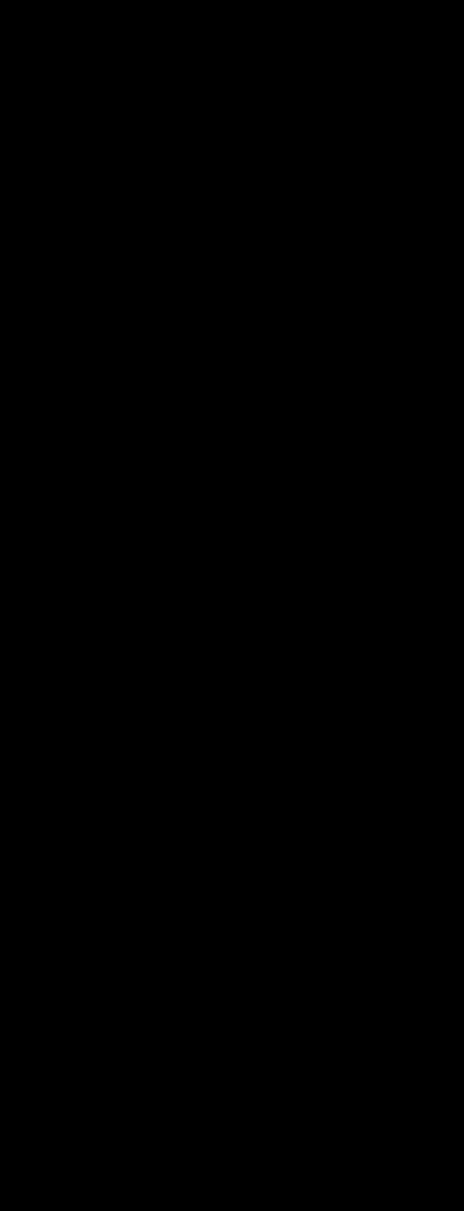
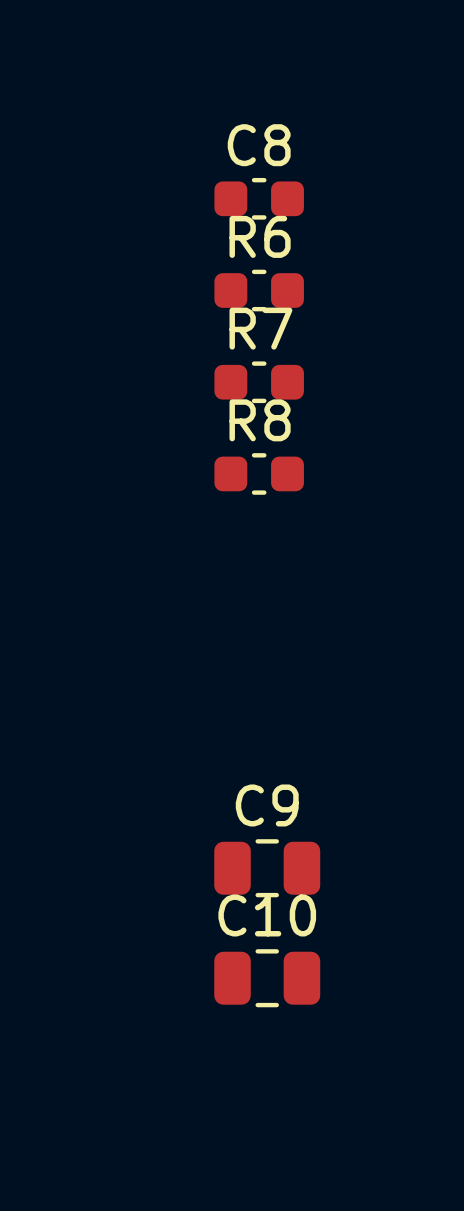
C8: none -> (259, 198)
R6: none -> (259, 290)
R7: none -> (259, 382)
R8: none -> (259, 473)
C9: none -> (267, 868)
C10: none -> (267, 978)

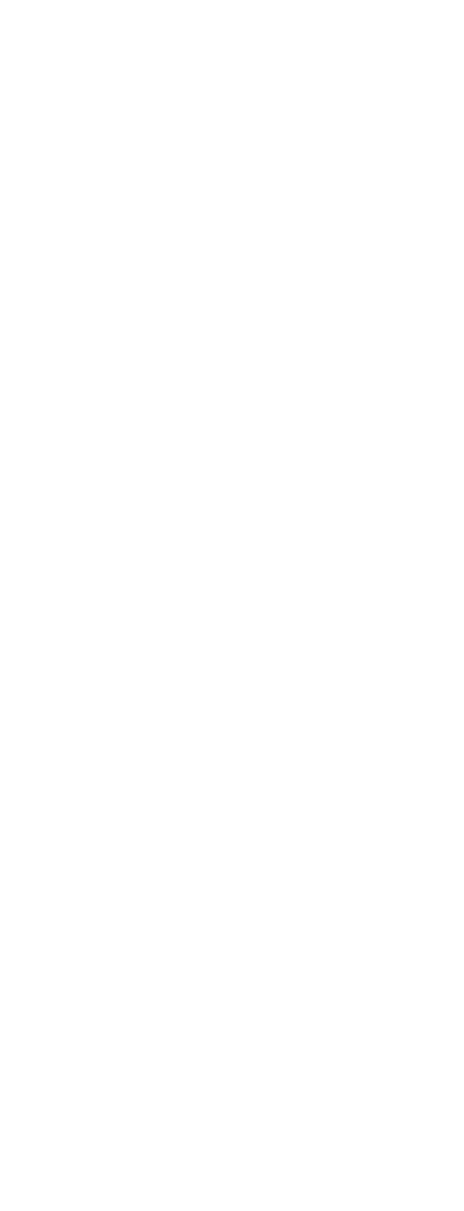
C8: (259, 198) -> none
R6: (259, 290) -> none
R7: (259, 382) -> none
R8: (259, 473) -> none
C9: (267, 868) -> none
C10: (267, 978) -> none

